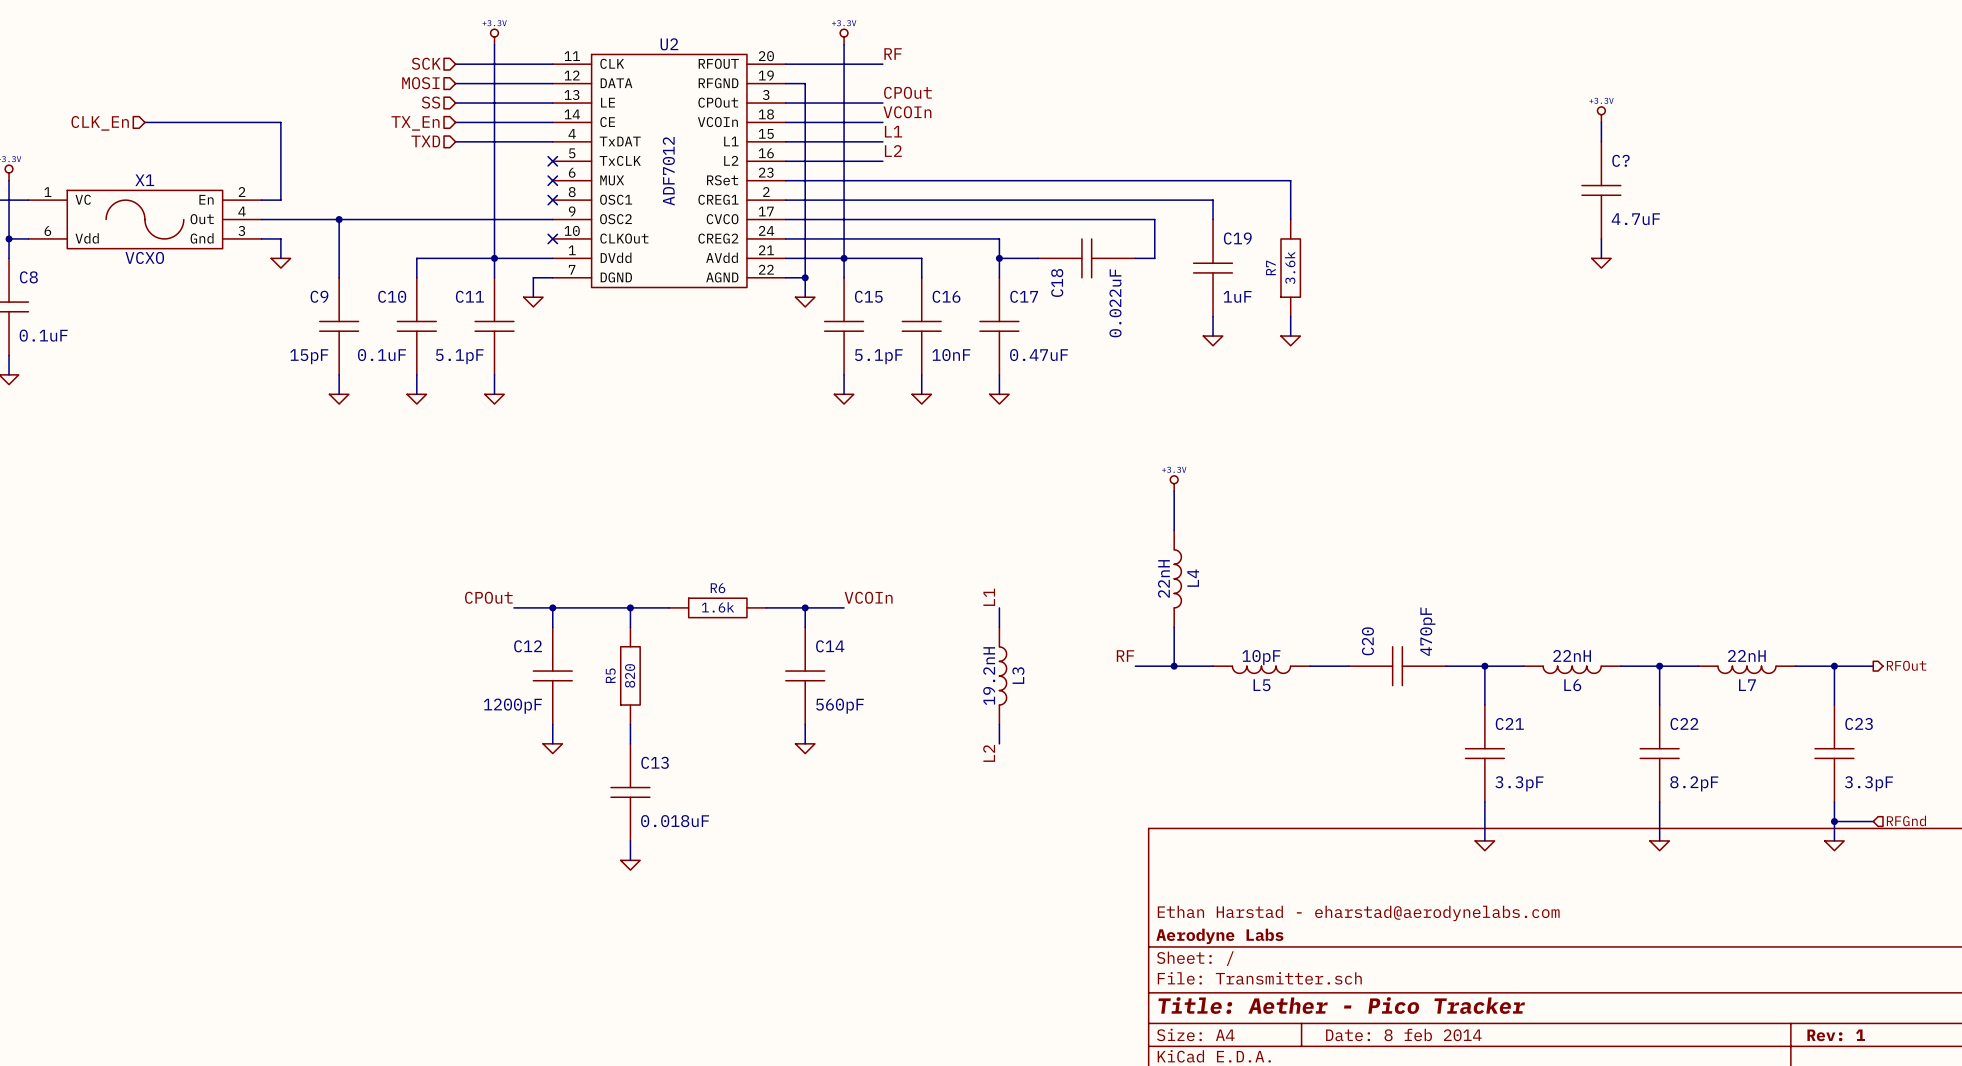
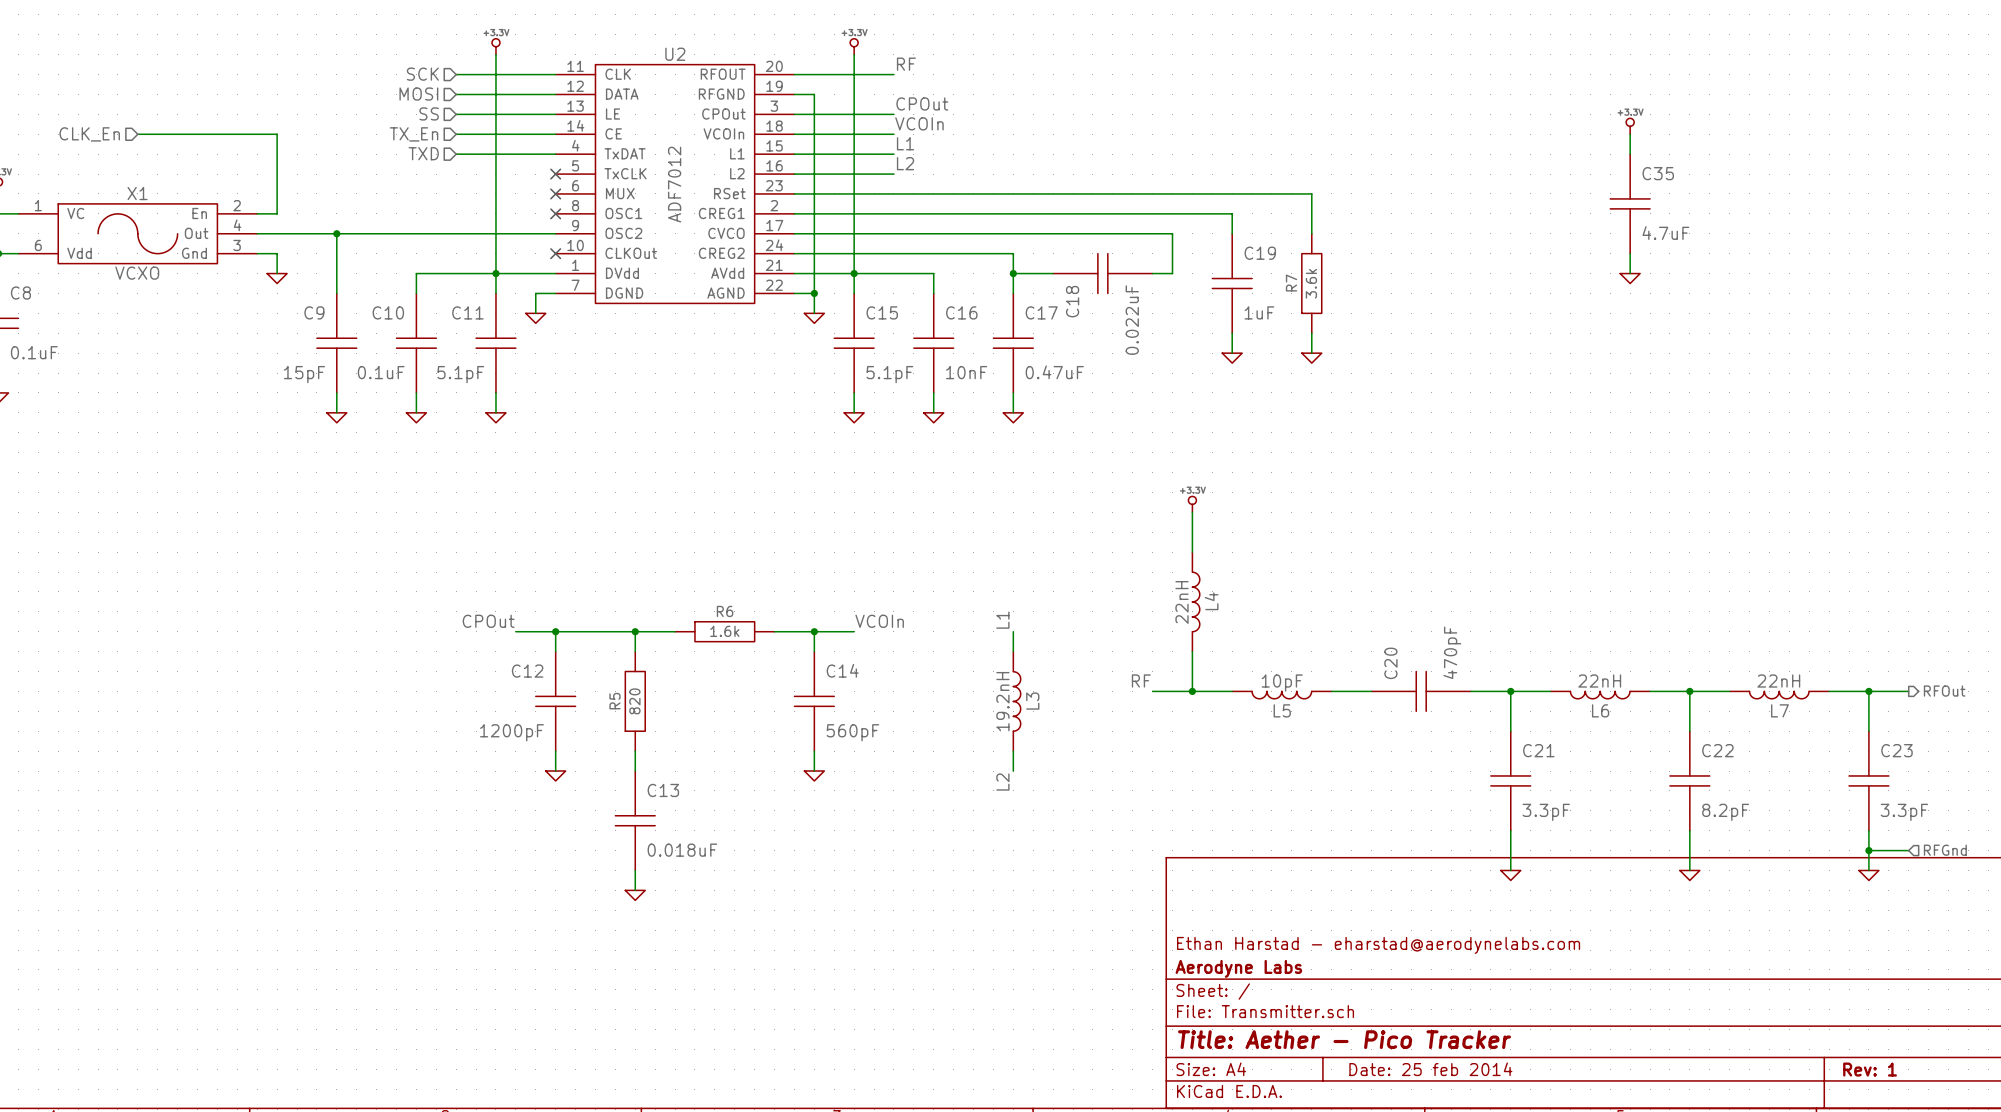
C? name: C? (1620, 160) -> C35 (1658, 173)
title block: Date: 8 feb 2014 (1403, 1034) -> Date: 25 feb 2014 (1430, 1069)

